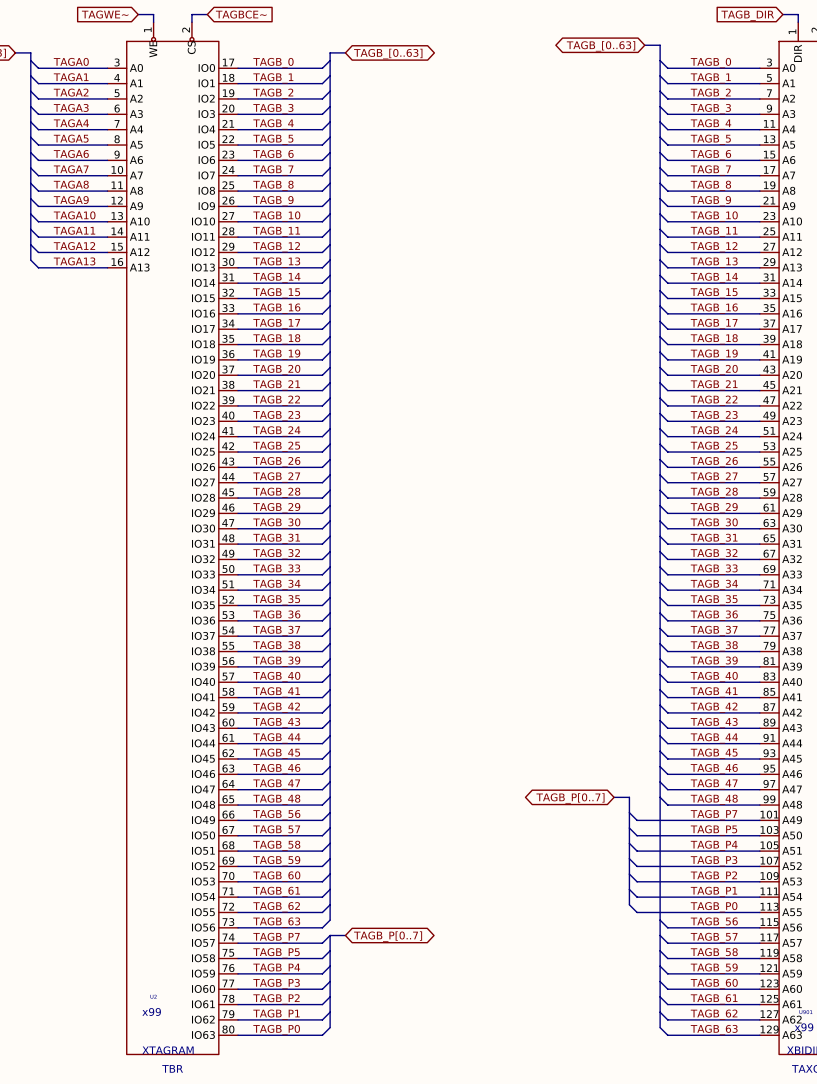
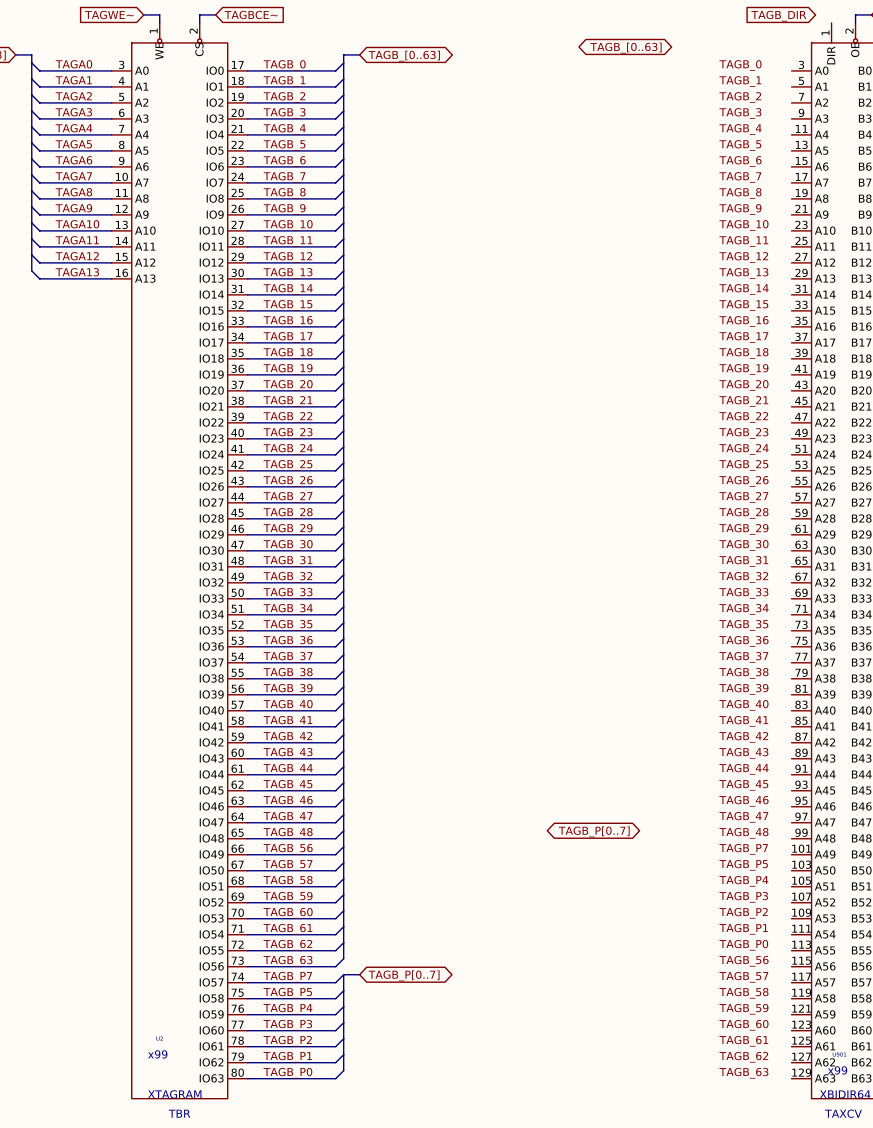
wire: (782, 14) (798, 14) (798, 22) -> none
bus: (644, 45) (660, 45) (660, 1027) -> none
wire: (660, 60) (667, 68) (759, 68) -> none
wire: (660, 75) (667, 83) (759, 83) -> none
wire: (660, 91) (667, 98) (759, 98) -> none
wire: (660, 106) (667, 114) (759, 114) -> none
wire: (660, 122) (667, 129) (759, 129) -> none
wire: (660, 137) (667, 145) (759, 145) -> none
wire: (660, 152) (667, 160) (759, 160) -> none
wire: (660, 168) (667, 175) (759, 175) -> none
wire: (660, 183) (667, 191) (759, 191) -> none
wire: (660, 198) (667, 206) (759, 206) -> none
wire: (660, 214) (667, 221) (759, 221) -> none
wire: (660, 229) (667, 237) (759, 237) -> none
wire: (660, 244) (667, 252) (759, 252) -> none
wire: (660, 260) (667, 267) (759, 267) -> none
wire: (660, 275) (667, 283) (759, 283) -> none
wire: (660, 290) (667, 298) (759, 298) -> none
wire: (660, 306) (667, 313) (759, 313) -> none
wire: (660, 321) (667, 329) (759, 329) -> none
wire: (660, 336) (667, 344) (759, 344) -> none
wire: (660, 352) (667, 359) (759, 359) -> none
wire: (660, 367) (667, 375) (759, 375) -> none
wire: (660, 382) (667, 390) (759, 390) -> none
wire: (660, 398) (667, 405) (759, 405) -> none
wire: (660, 413) (667, 421) (759, 421) -> none
wire: (660, 428) (667, 436) (759, 436) -> none
wire: (660, 444) (667, 452) (759, 452) -> none
wire: (660, 459) (667, 467) (759, 467) -> none
wire: (660, 475) (667, 482) (759, 482) -> none
wire: (660, 490) (667, 498) (759, 498) -> none
wire: (660, 505) (667, 513) (759, 513) -> none
wire: (660, 521) (667, 528) (759, 528) -> none
wire: (660, 536) (667, 544) (759, 544) -> none
wire: (660, 551) (667, 559) (759, 559) -> none
wire: (660, 567) (667, 574) (759, 574) -> none
wire: (660, 582) (667, 590) (759, 590) -> none
wire: (660, 597) (667, 605) (759, 605) -> none
wire: (660, 613) (667, 620) (759, 620) -> none
wire: (660, 628) (667, 636) (759, 636) -> none
wire: (660, 643) (667, 651) (759, 651) -> none
wire: (660, 659) (667, 666) (759, 666) -> none
wire: (660, 674) (667, 682) (759, 682) -> none
wire: (660, 689) (667, 697) (759, 697) -> none
wire: (660, 705) (667, 712) (759, 712) -> none
wire: (660, 720) (667, 728) (759, 728) -> none
wire: (660, 735) (667, 743) (759, 743) -> none
wire: (660, 751) (667, 758) (759, 758) -> none
wire: (660, 766) (667, 774) (759, 774) -> none
wire: (660, 782) (667, 789) (759, 789) -> none
bus: (614, 797) (629, 797) (629, 904) -> none
wire: (660, 797) (667, 805) (759, 805) -> none
wire: (629, 812) (637, 820) (759, 820) -> none
wire: (629, 828) (637, 835) (759, 835) -> none
wire: (629, 843) (637, 851) (759, 851) -> none
wire: (629, 858) (637, 866) (759, 866) -> none
wire: (629, 874) (637, 881) (759, 881) -> none
wire: (629, 889) (637, 897) (759, 897) -> none
wire: (629, 904) (637, 912) (759, 912) -> none
wire: (660, 920) (667, 927) (759, 927) -> none
wire: (660, 935) (667, 943) (759, 943) -> none
wire: (660, 950) (667, 958) (759, 958) -> none
wire: (660, 966) (667, 973) (759, 973) -> none
wire: (660, 981) (667, 989) (759, 989) -> none
wire: (660, 996) (667, 1004) (759, 1004) -> none
wire: (660, 1012) (667, 1019) (759, 1019) -> none
wire: (660, 1027) (667, 1035) (759, 1035) -> none

